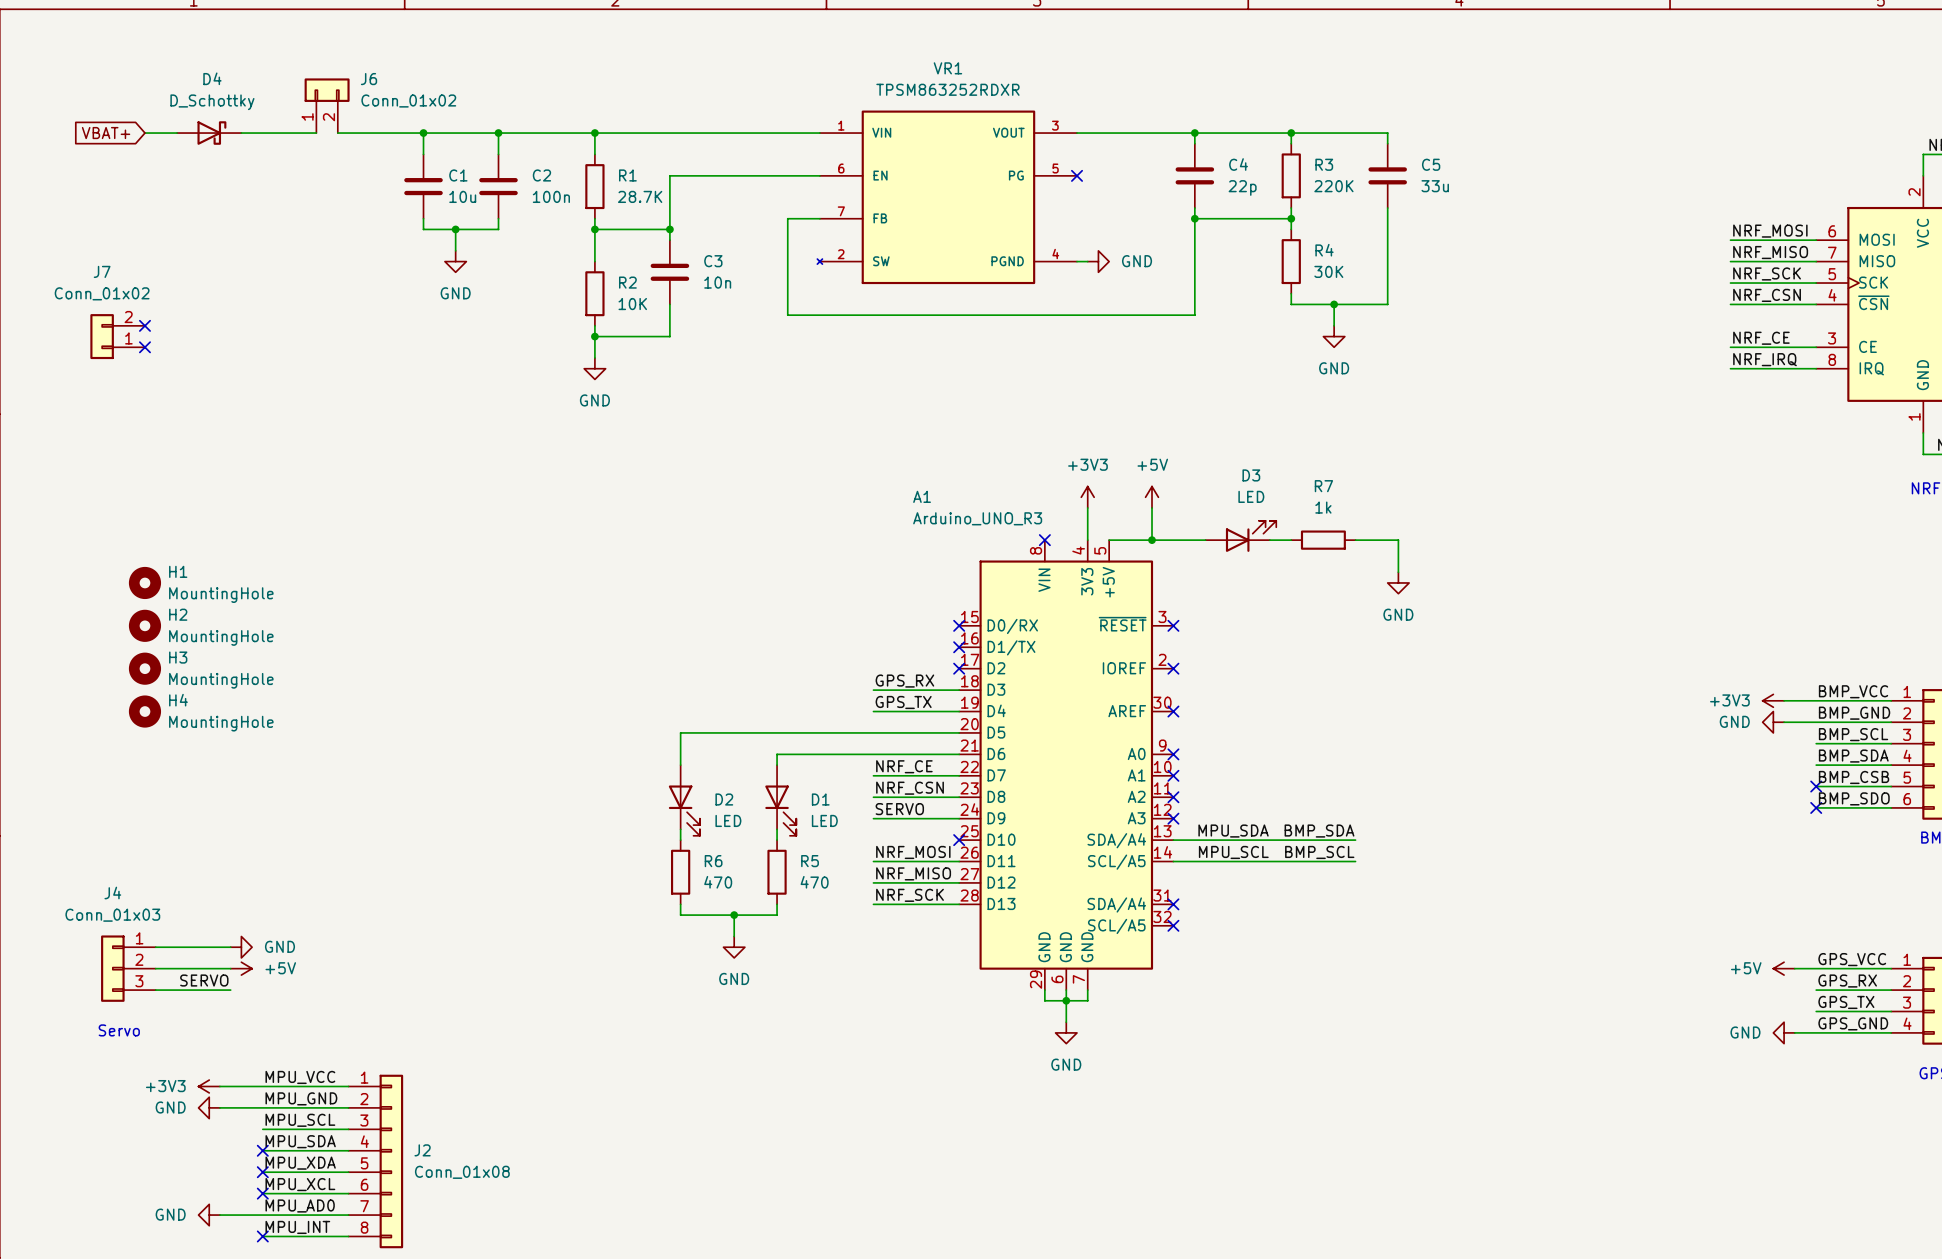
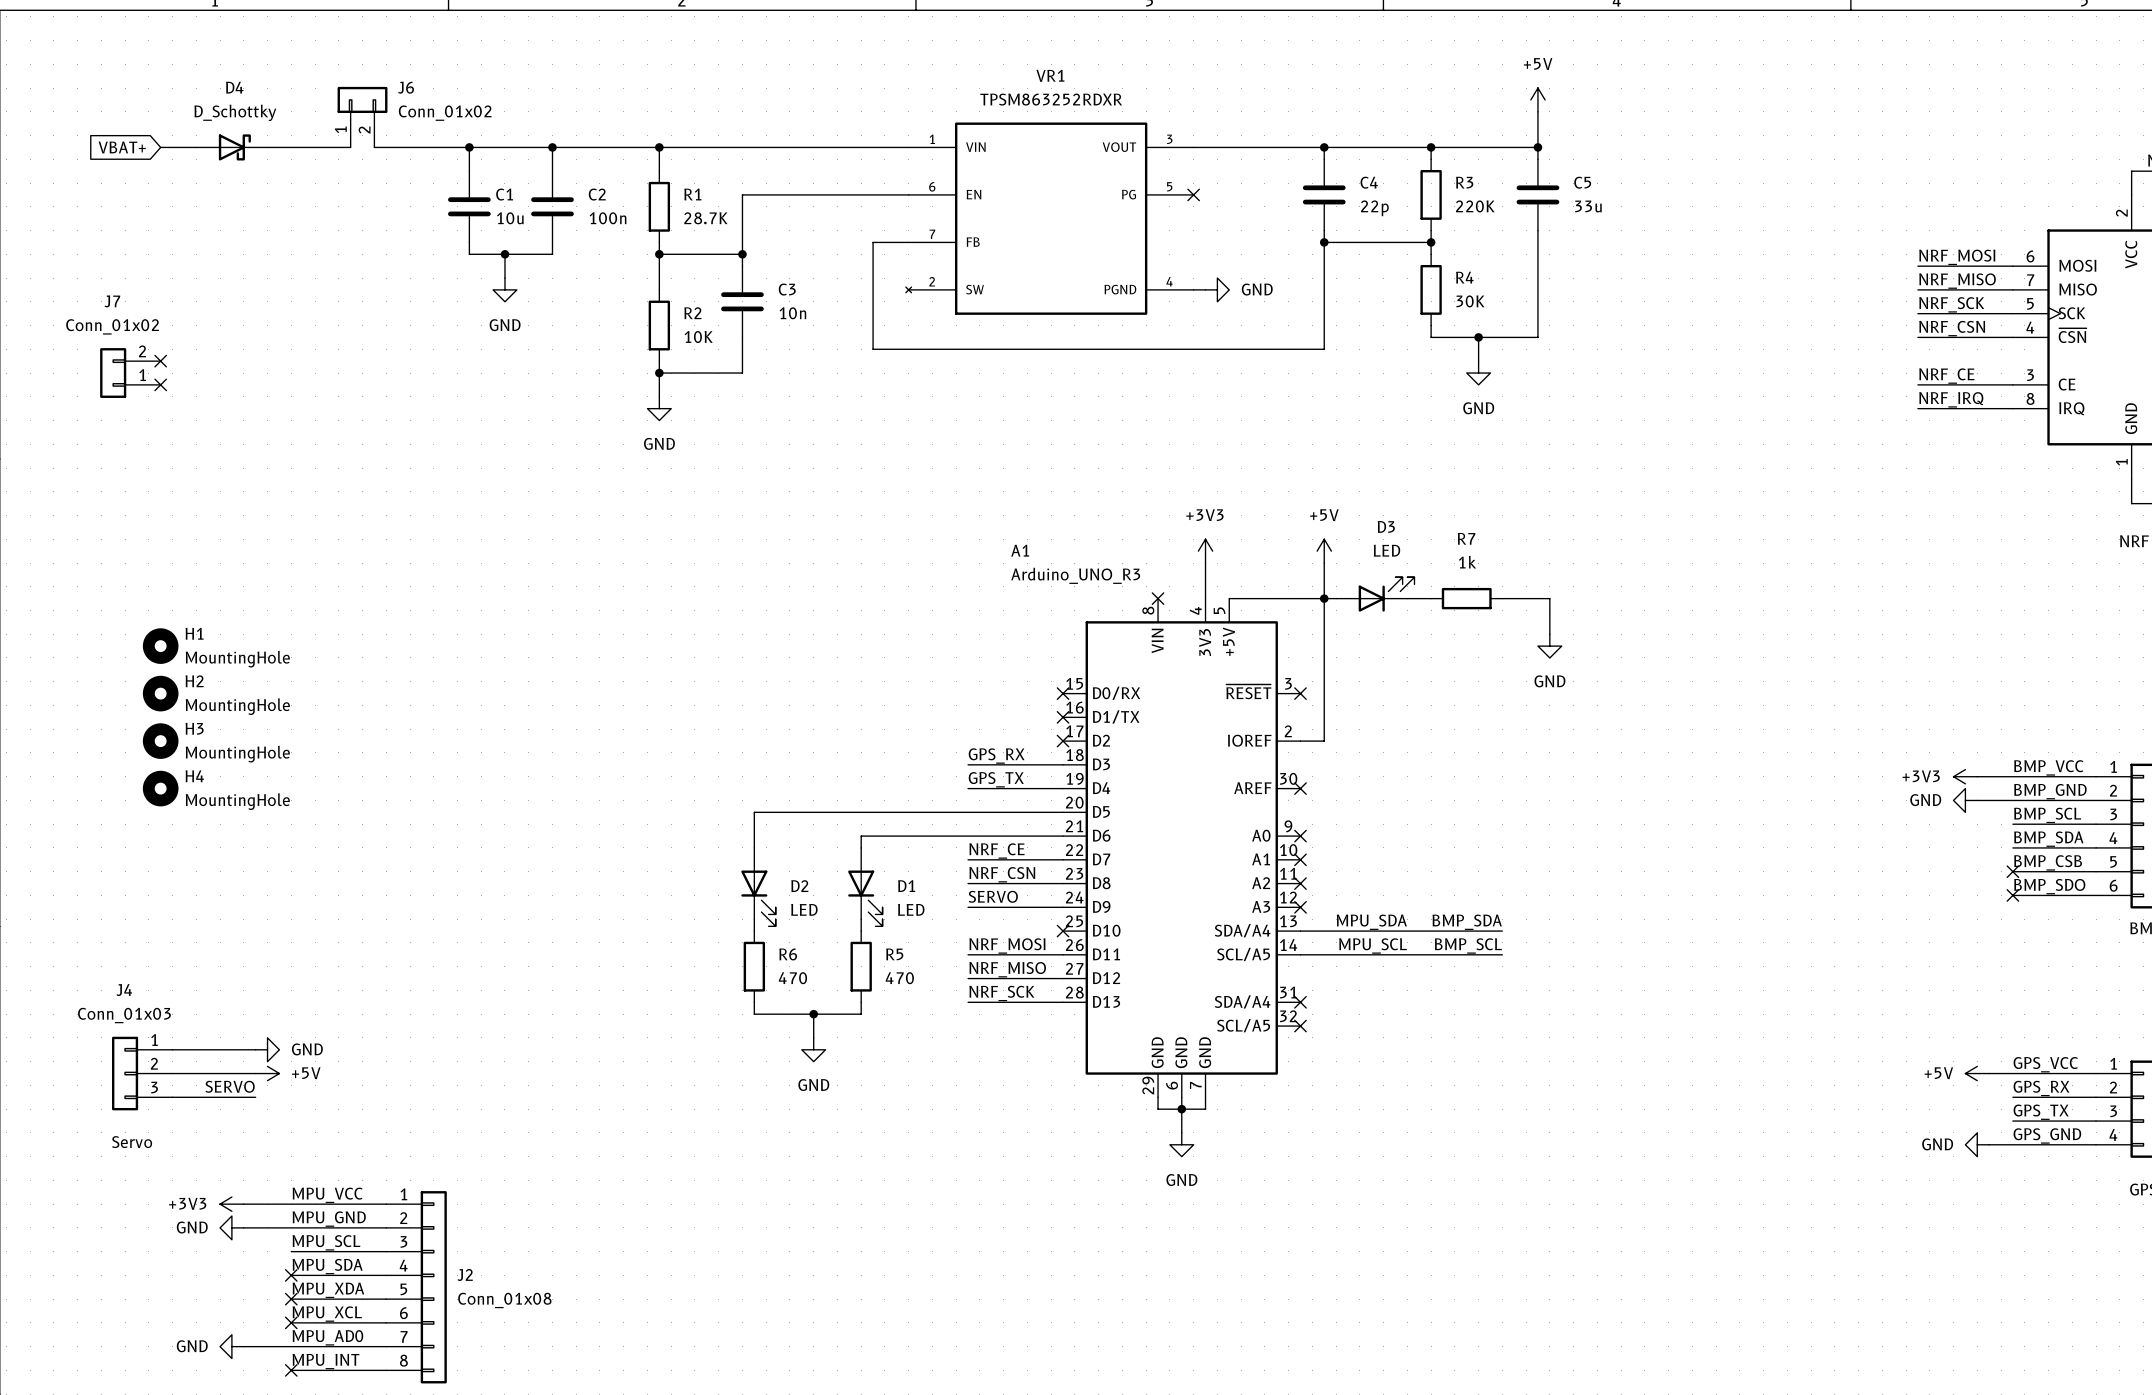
power symbol: none -> +5V (1537, 99)
wire: none -> (1537, 111) (1537, 147)
junction: none -> (1537, 147)
power symbol position: +5V (1152, 497) -> +5V (1324, 551)
wire: (1152, 507) (1152, 540) -> none
wire: none -> (1324, 563) (1324, 741) (1300, 741)
junction position: (1152, 540) -> (1324, 598)
no-connect mark: (1173, 668) -> none

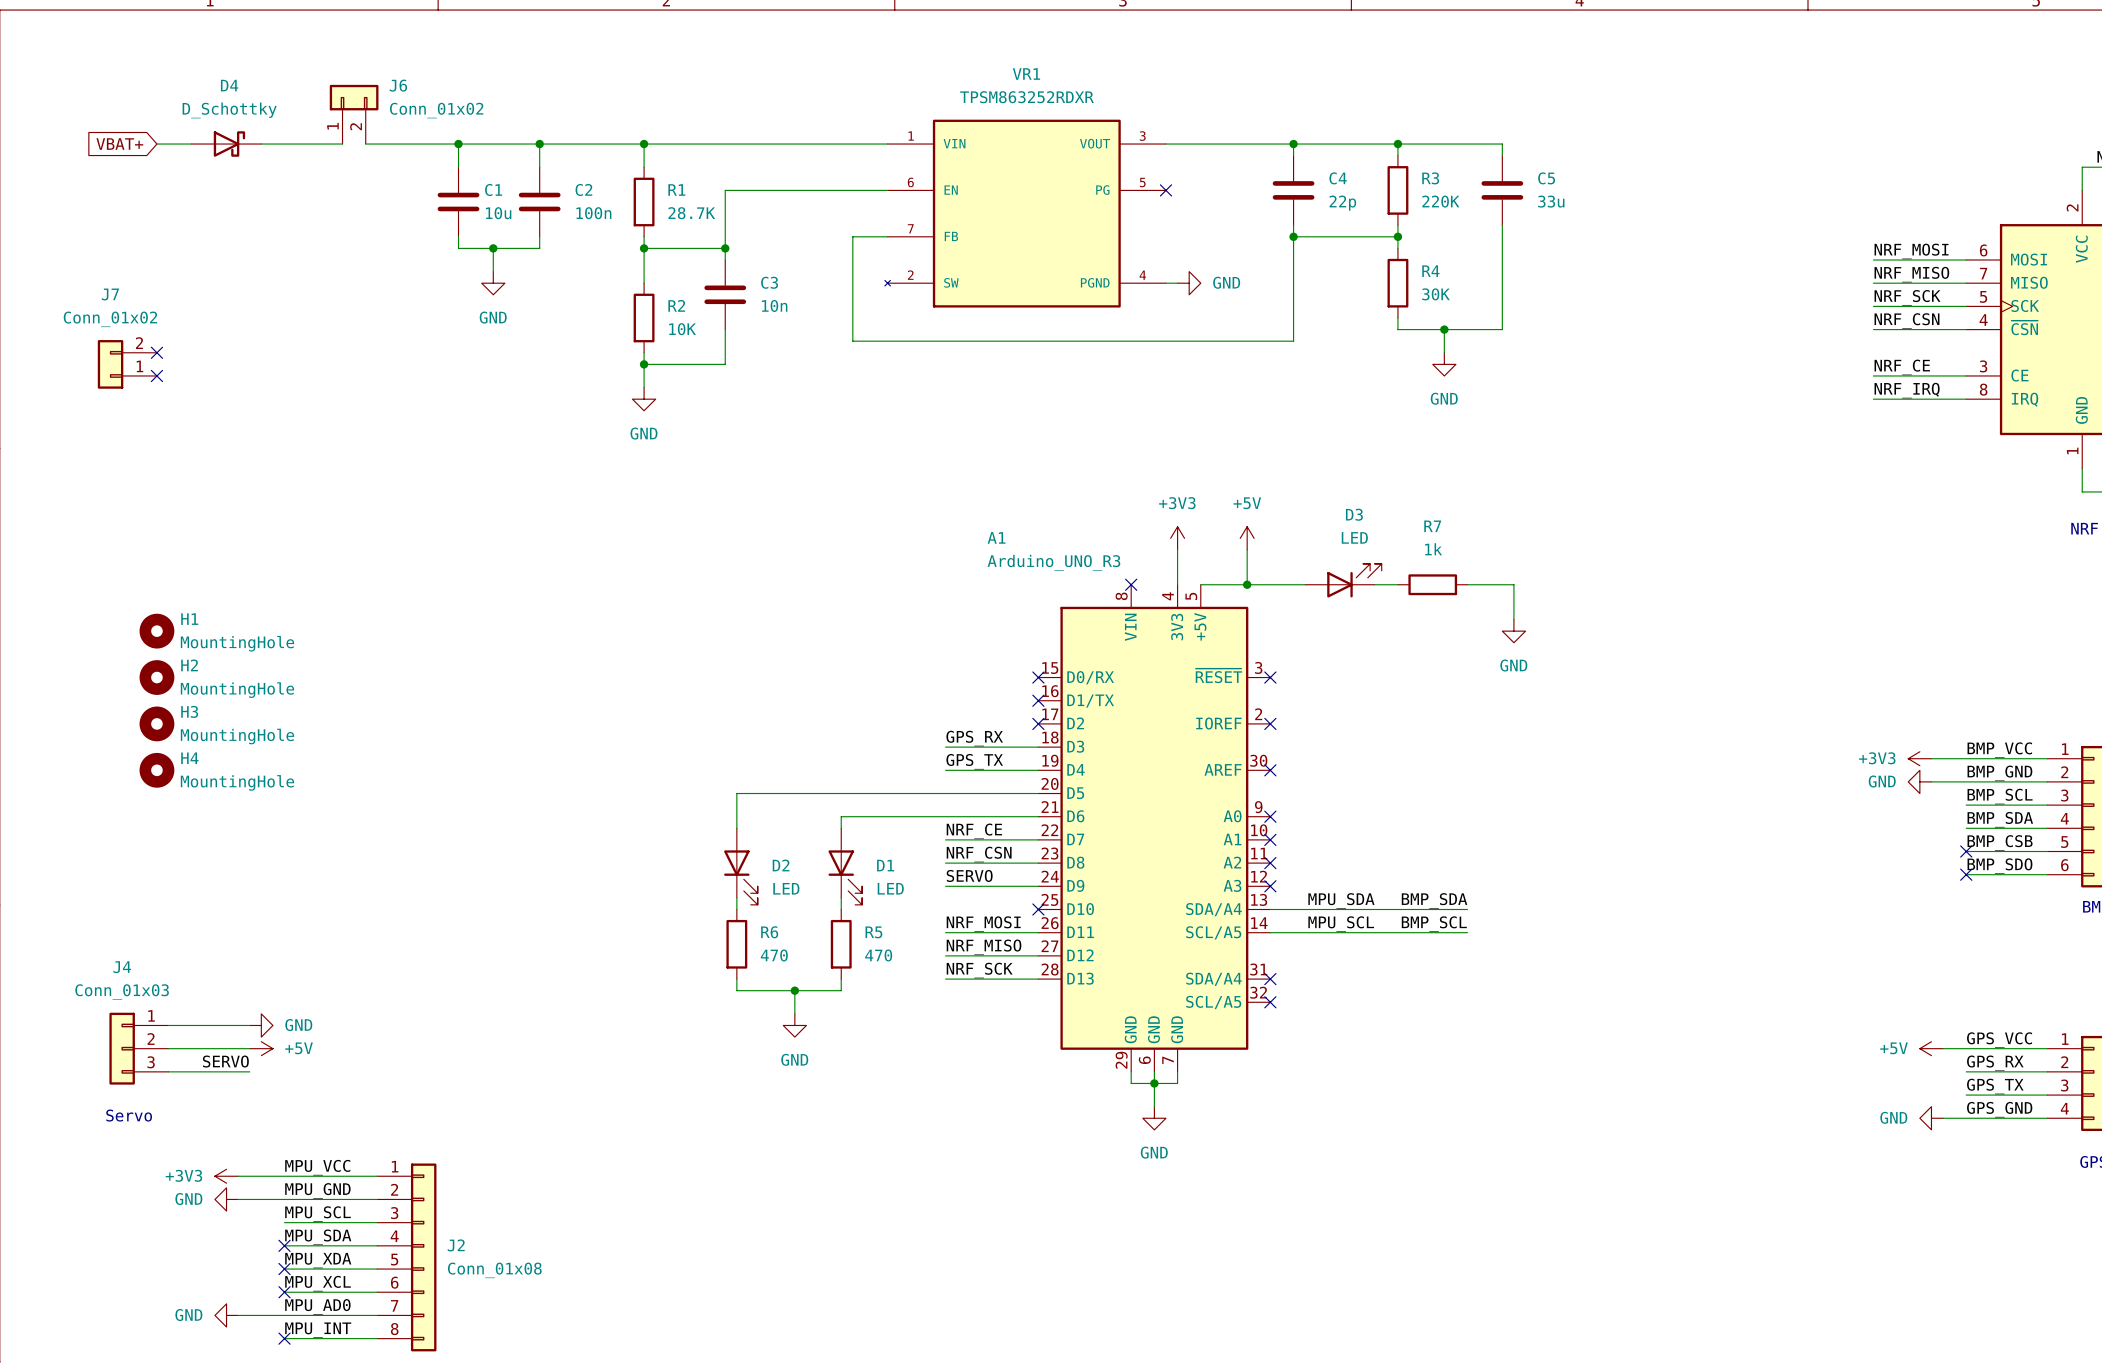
power symbol: +5V (1537, 99) -> none
wire: (1537, 111) (1537, 147) -> none
junction: (1537, 147) -> none
power symbol position: +5V (1324, 551) -> +5V (1247, 538)
wire: none -> (1247, 549) (1247, 584)
wire: (1324, 563) (1324, 741) (1300, 741) -> none
junction position: (1324, 598) -> (1247, 584)
no-connect mark: none -> (1270, 723)

